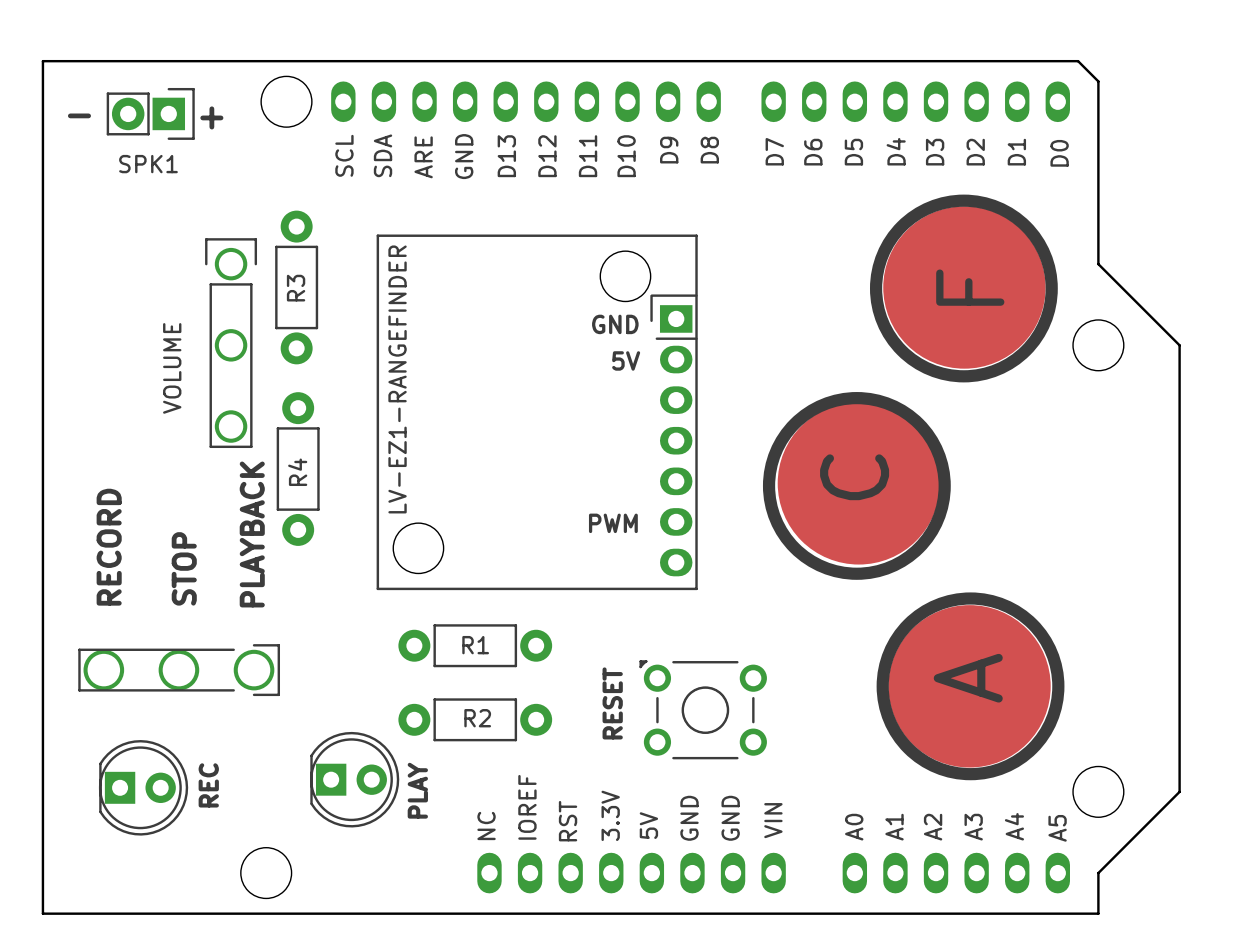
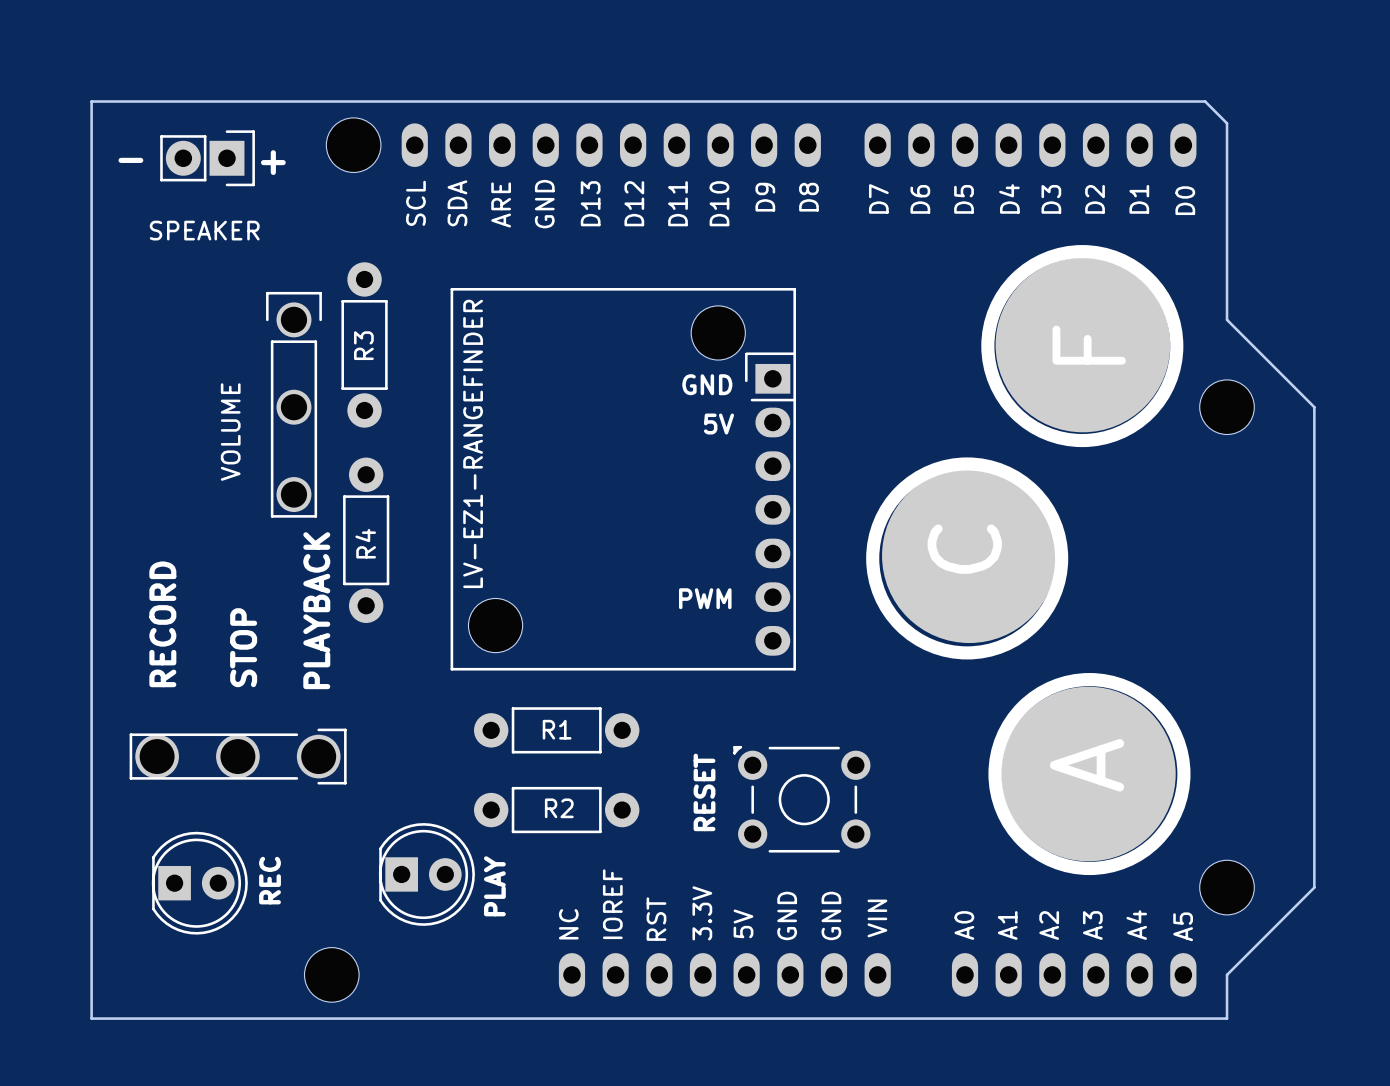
SPK1 name: SPK1 (148, 164) -> SPEAKER (204, 230)

